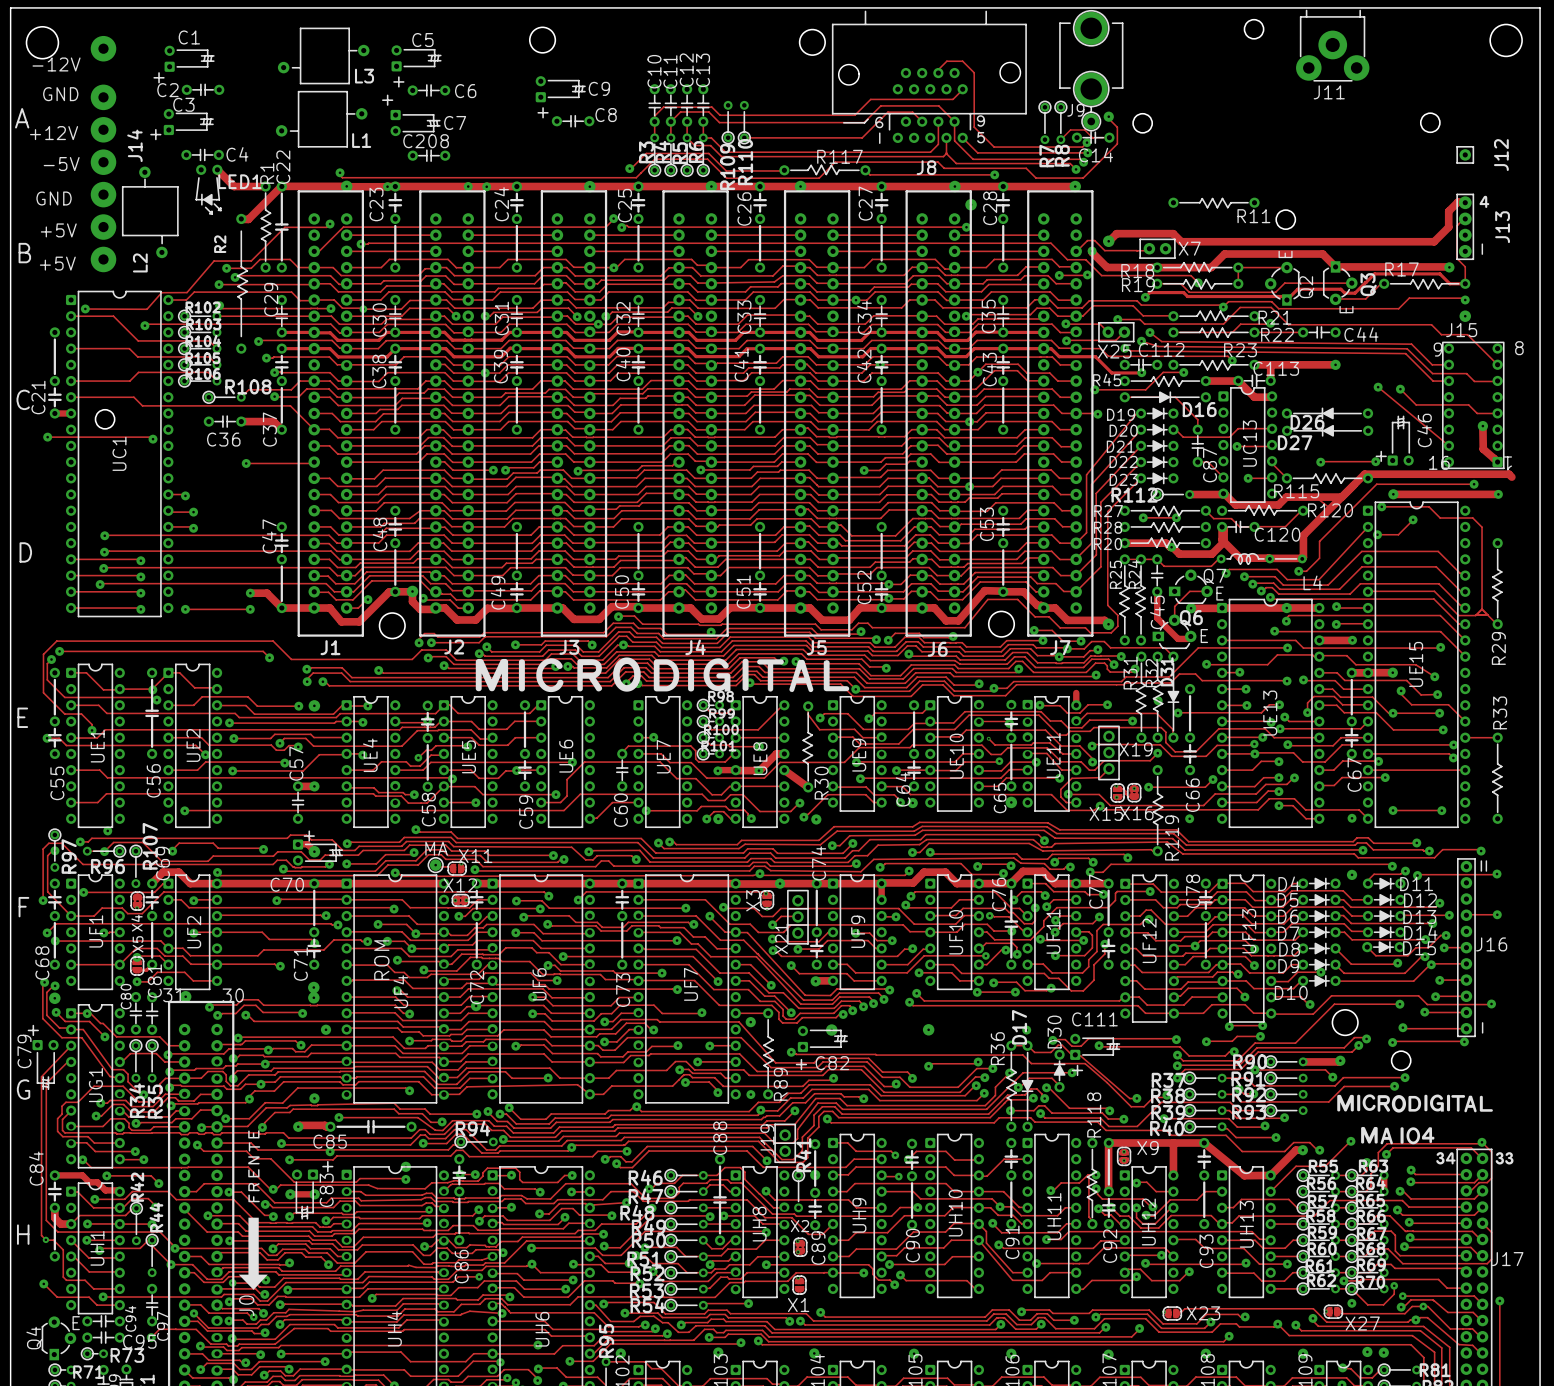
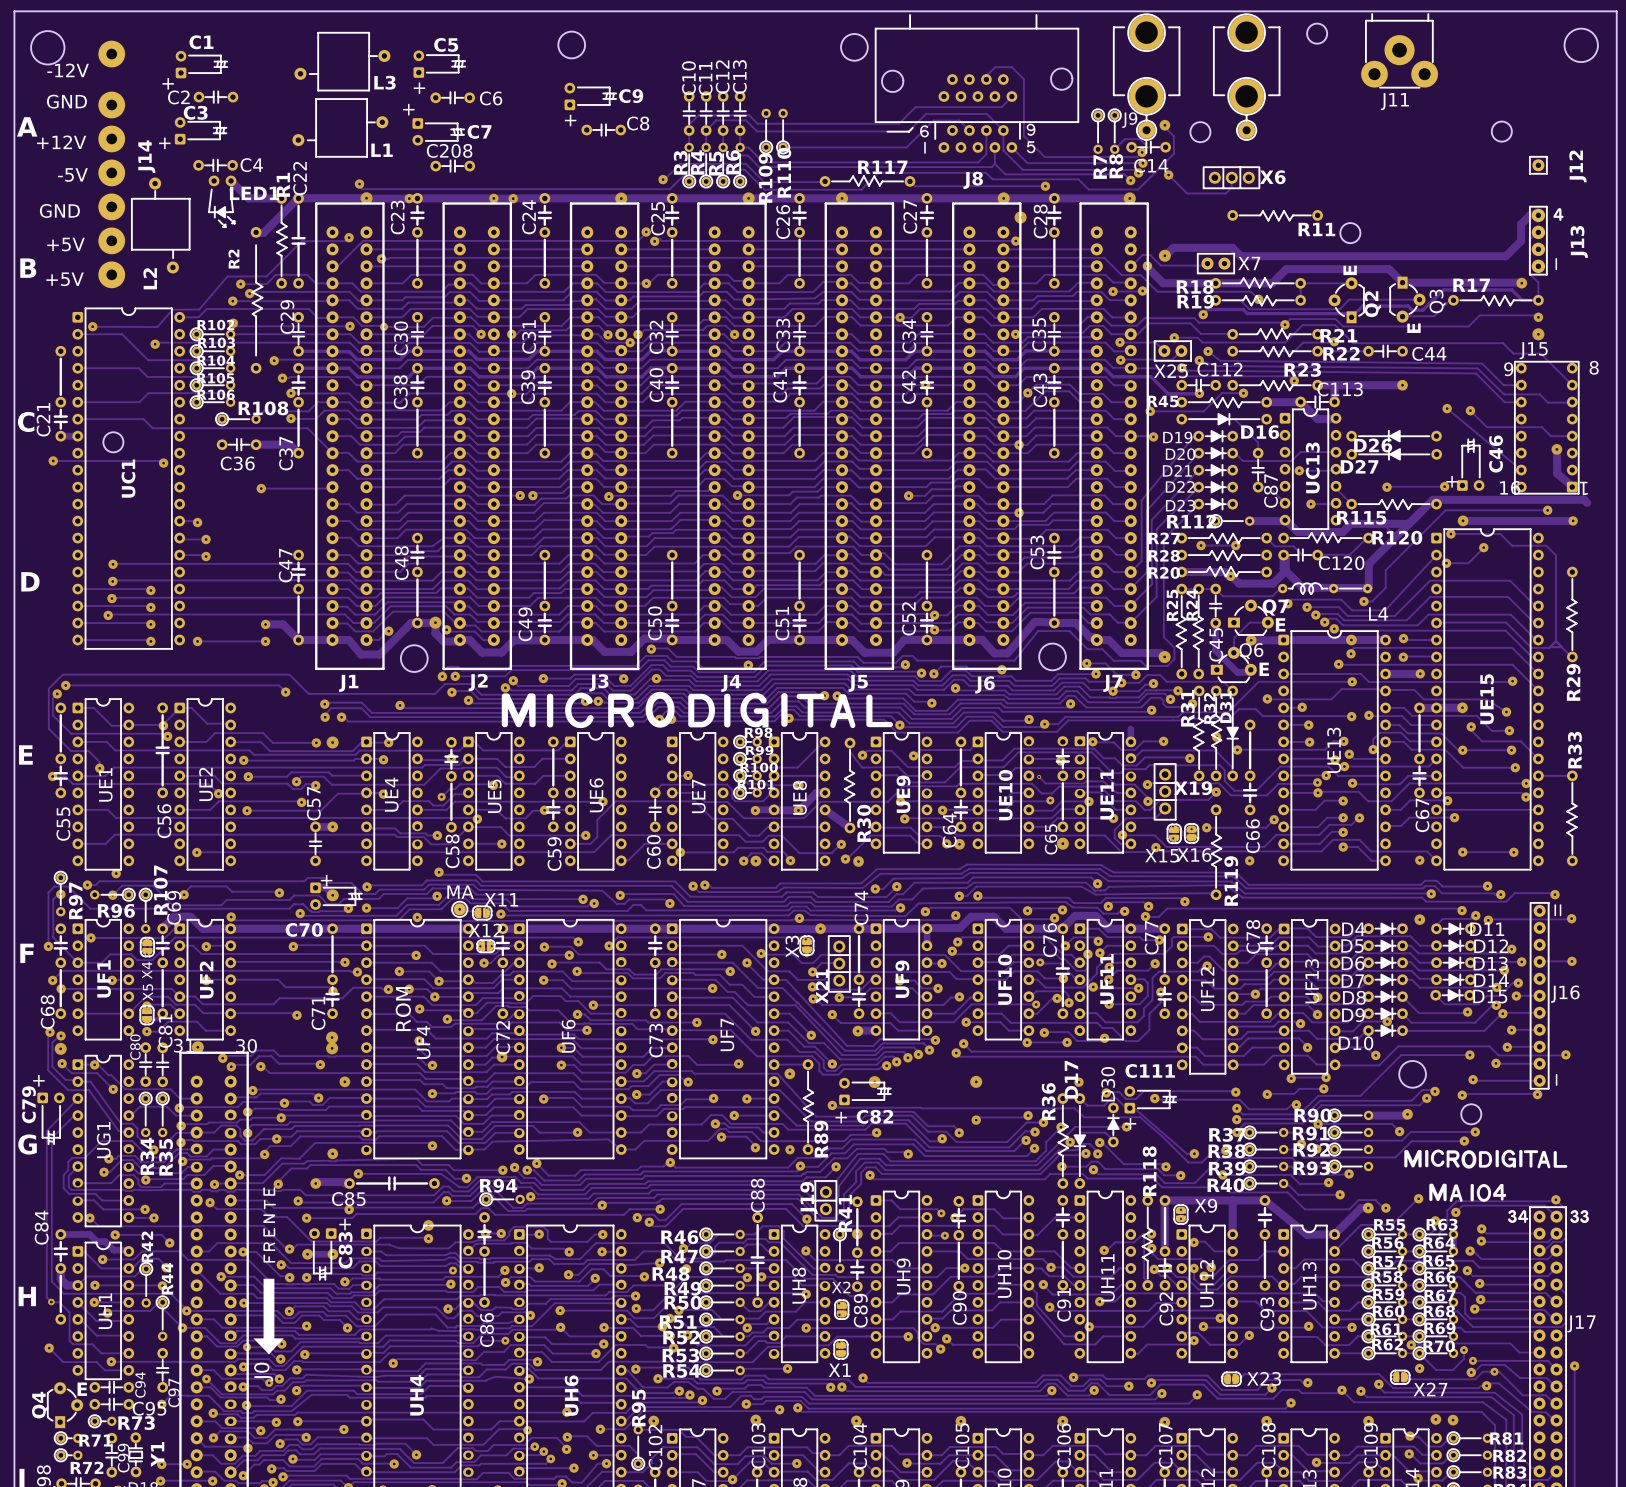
part: none -> (1246, 77)
track: none -> (1168, 175) (1187, 193) (1225, 193) (1231, 187) (1231, 177)
via: none -> (1168, 175)
X6: none -> (1231, 177)

